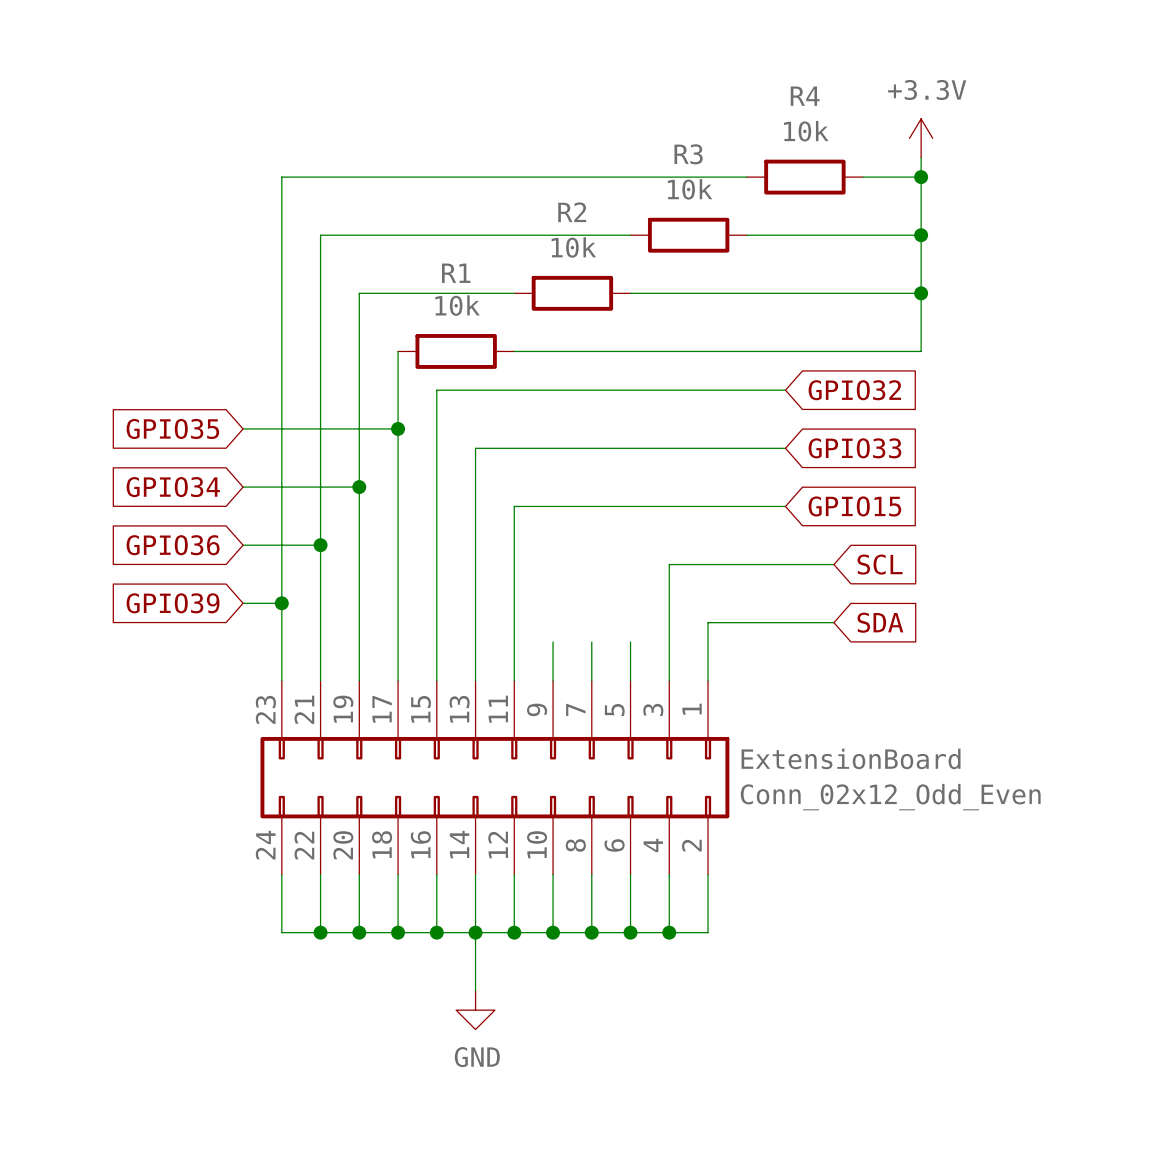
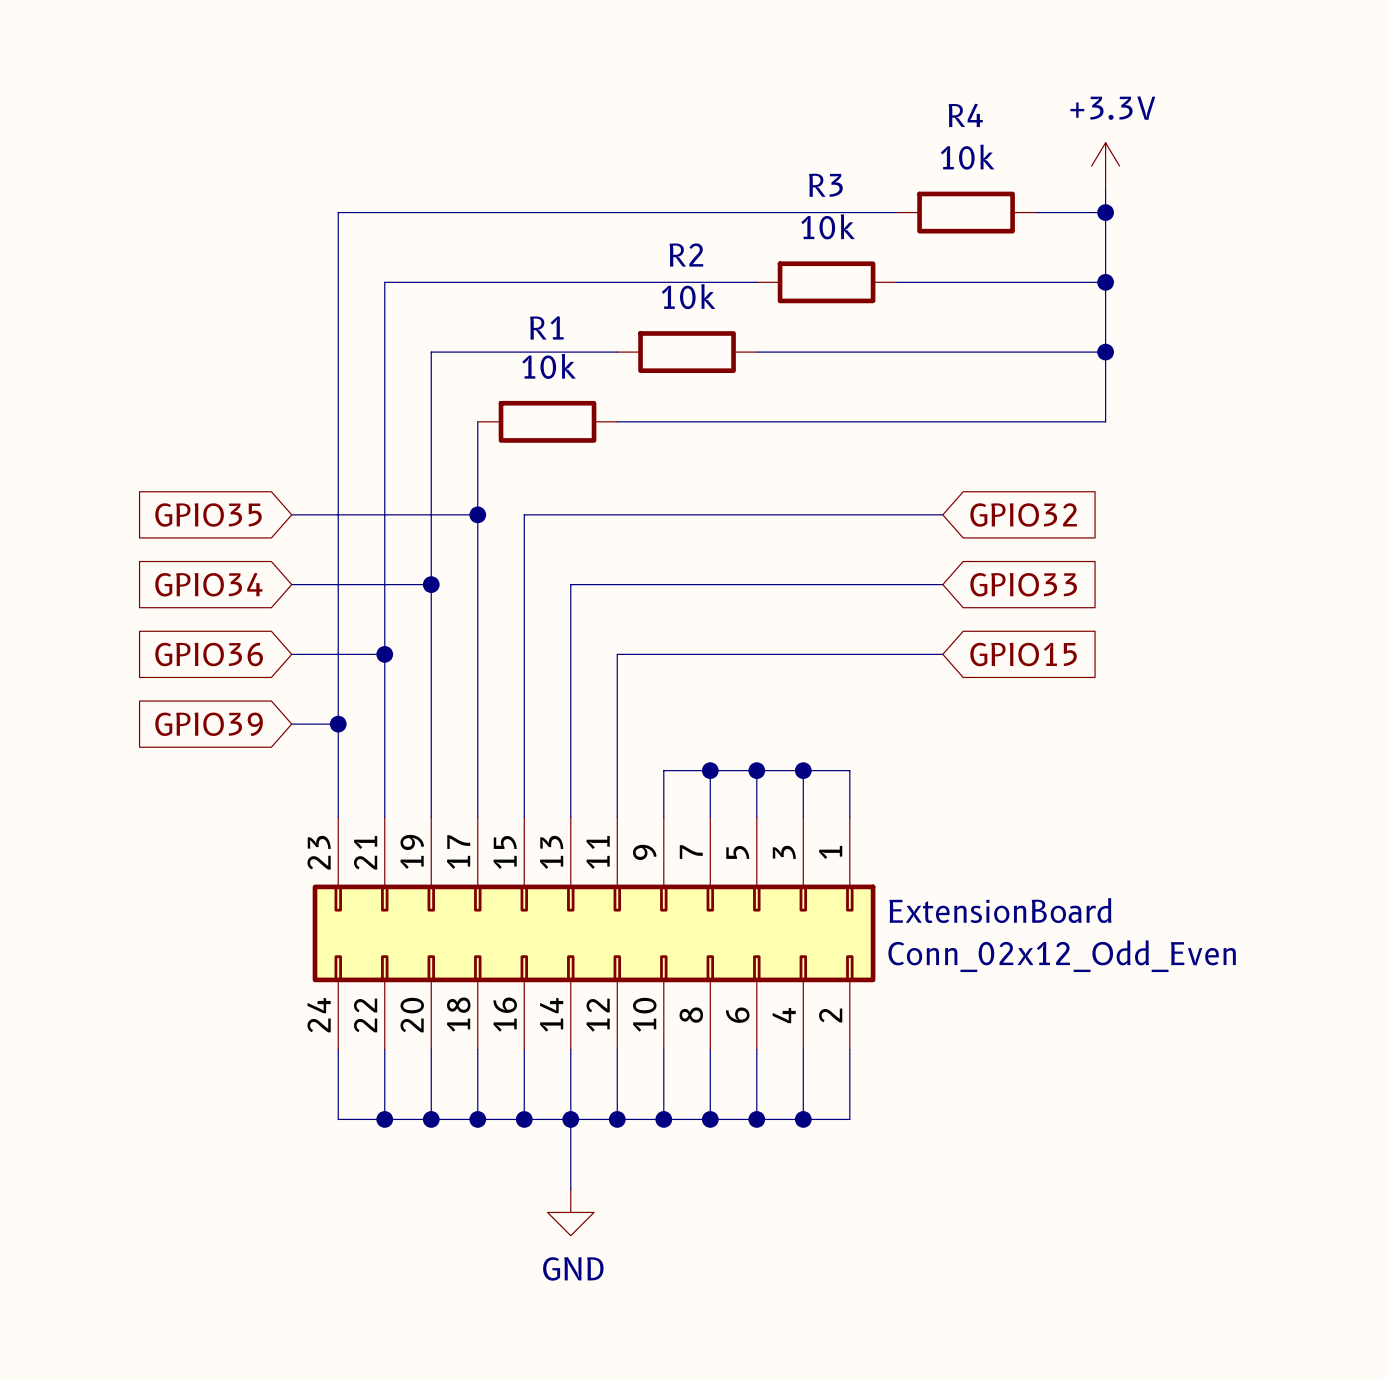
wire: (785, 390) (436, 390) (436, 428) -> (942, 514) (524, 514)
global label position: GPIO32 (854, 390) -> GPIO32 (1023, 514)
wire: (785, 448) (475, 448) (475, 487) -> (942, 584) (570, 584)
global label position: GPIO33 (854, 448) -> GPIO33 (1023, 584)
wire: (785, 506) (514, 506) (514, 545) -> (942, 654) (617, 654)
global label position: GPIO15 (854, 506) -> GPIO15 (1023, 654)
wire: (833, 564) (669, 564) (669, 642) -> none
global label: SCL (880, 564) -> none
wire: (833, 622) (708, 622) (708, 642) -> (663, 770) (849, 770)
global label: SDA (880, 622) -> none
junction: none -> (710, 770)
junction: none -> (756, 770)
junction: none -> (803, 770)

